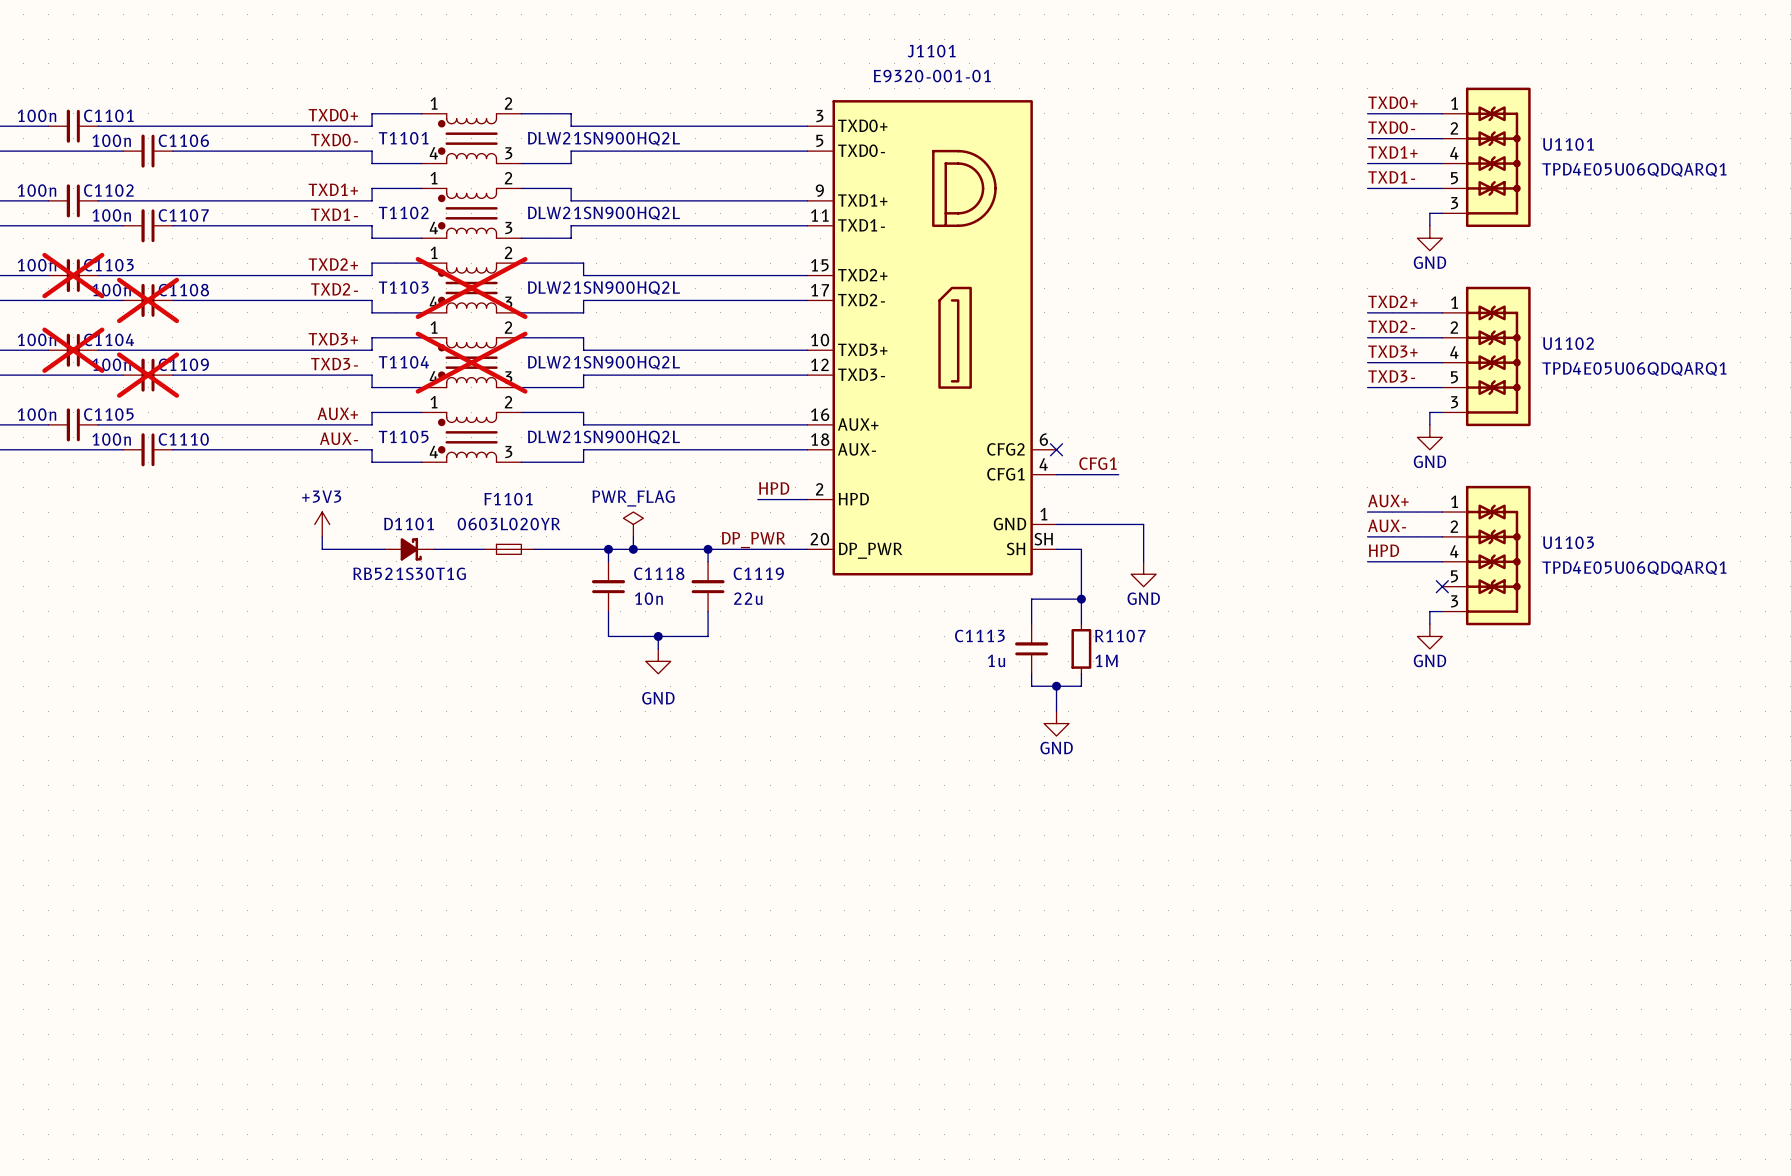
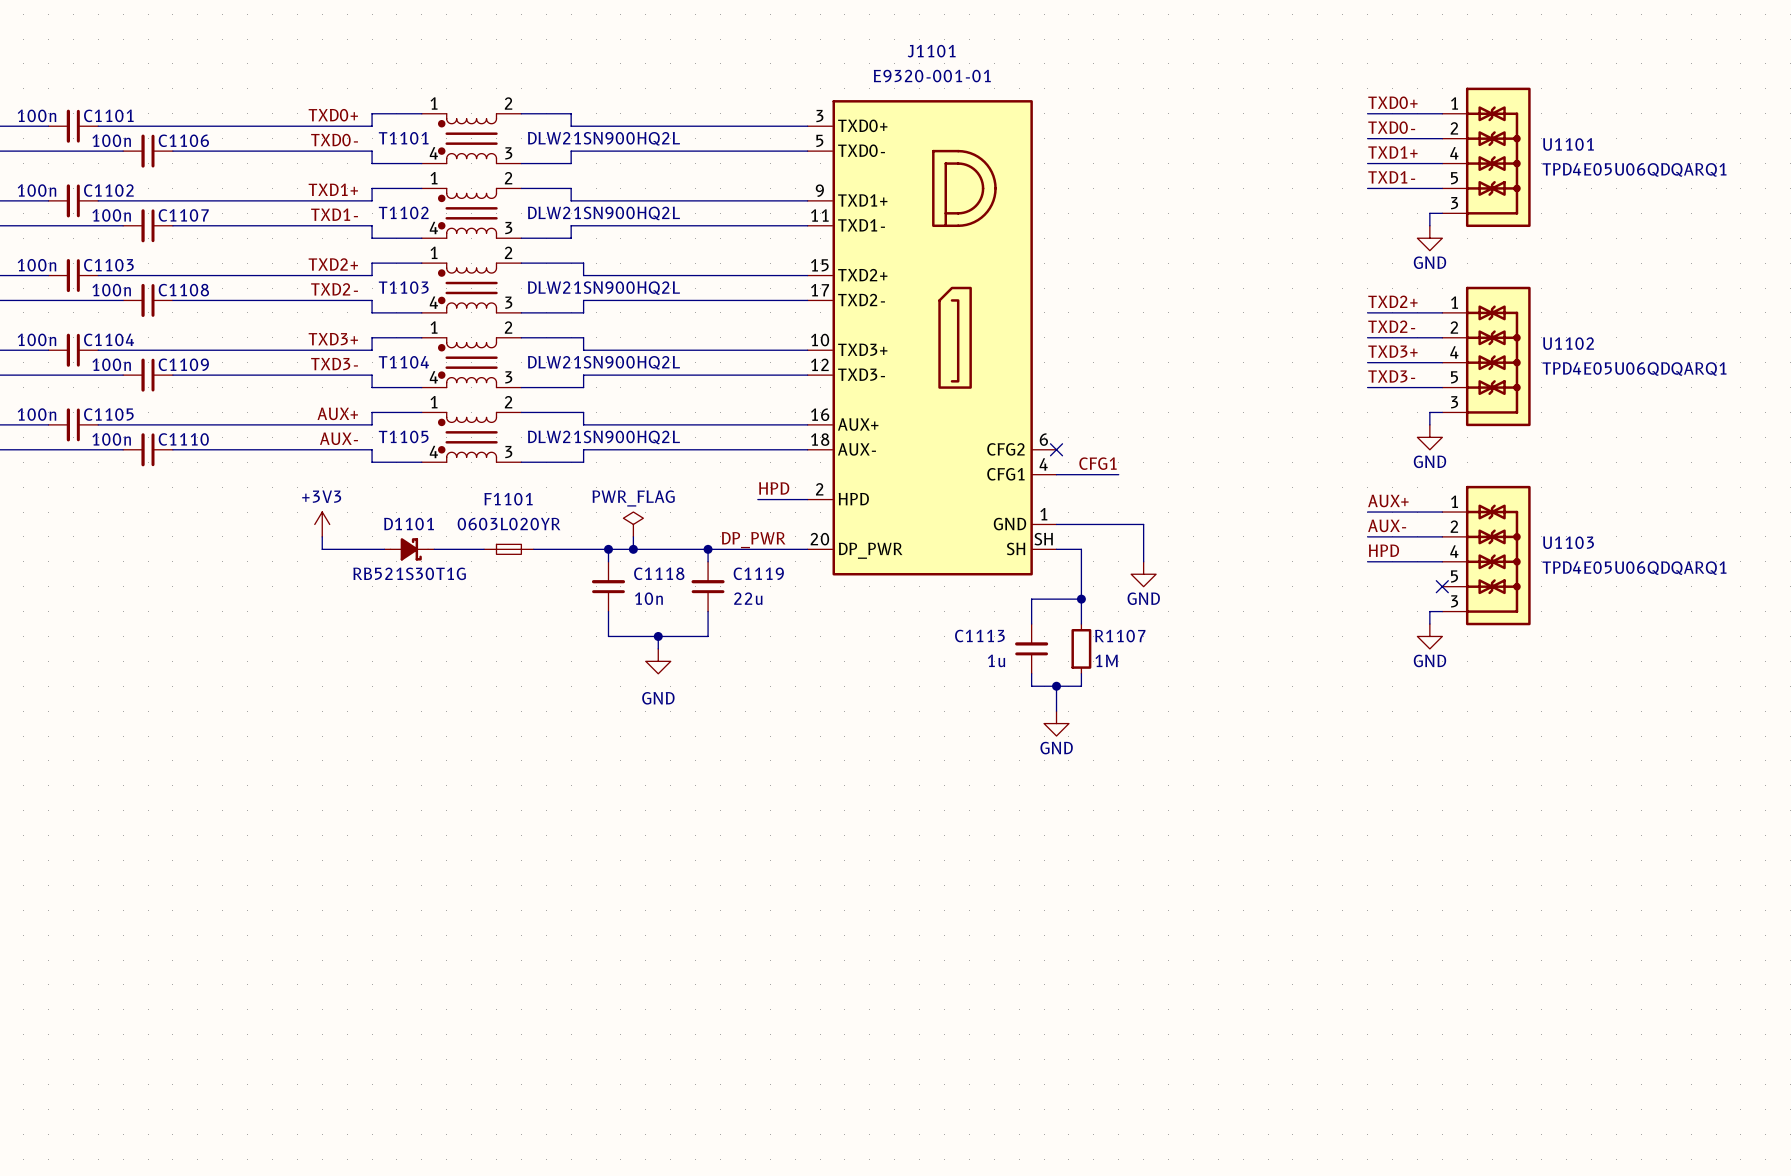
C1103 do-not-place cross: (73, 275) -> none
T1103 do-not-place cross: (471, 288) -> none
C1108 do-not-place cross: (148, 300) -> none
C1104 do-not-place cross: (73, 350) -> none
T1104 do-not-place cross: (471, 362) -> none
C1109 do-not-place cross: (148, 375) -> none

